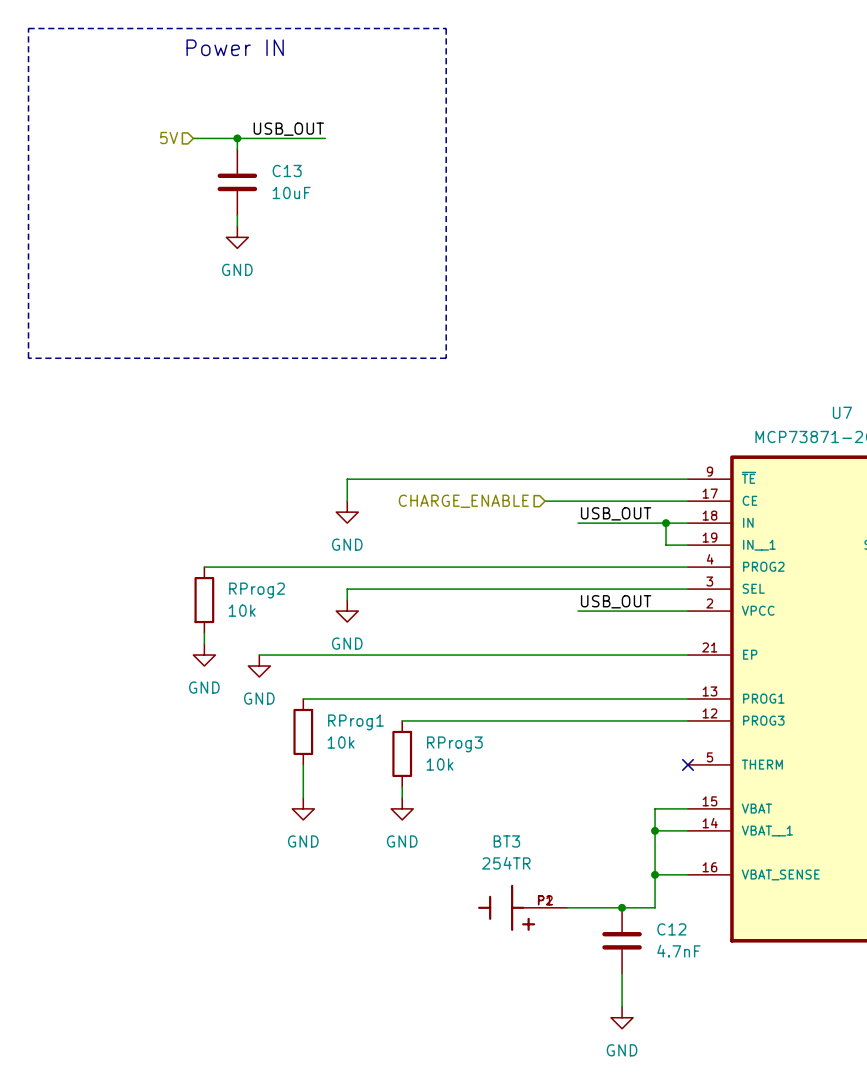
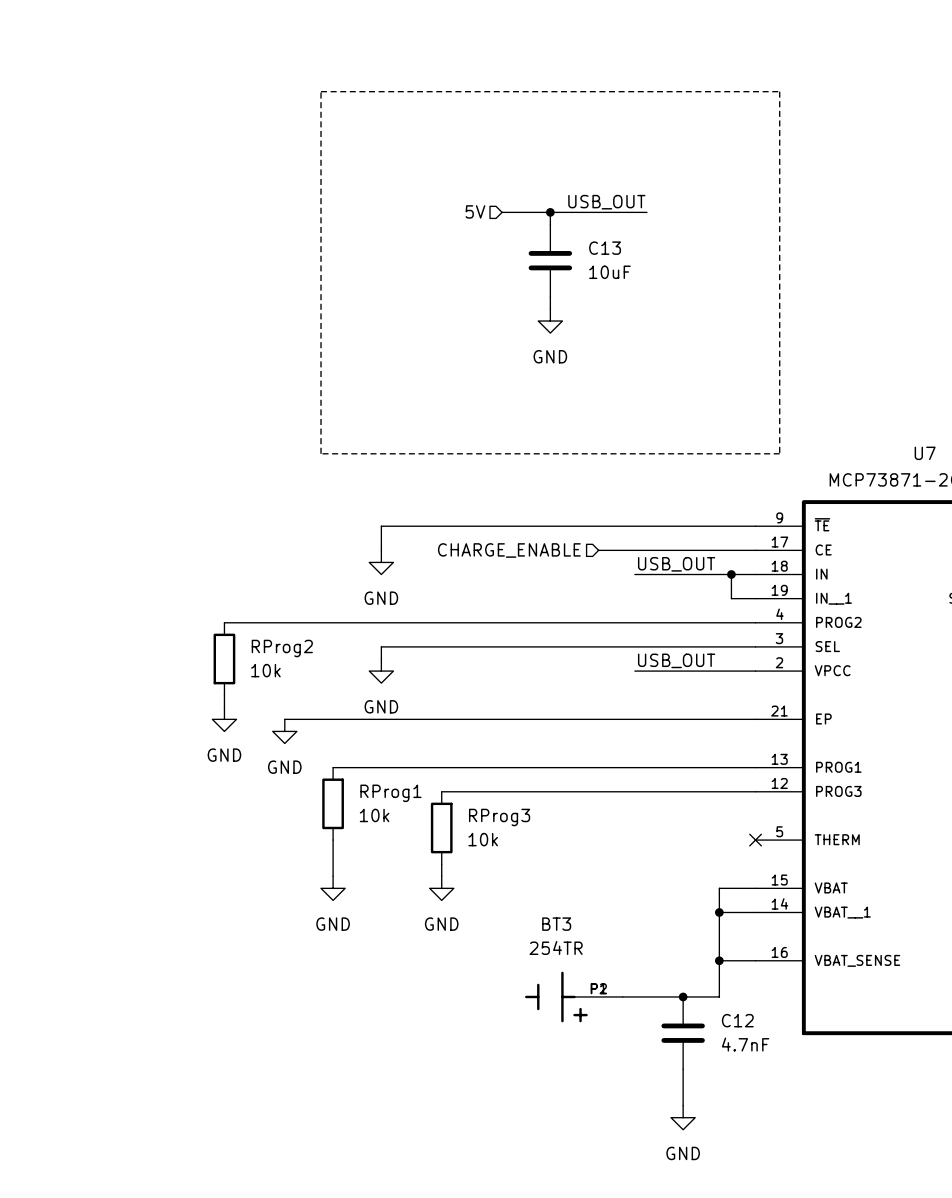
line: (28, 28) (446, 28) (446, 358) (28, 358) (28, 28) -> none
text: Power IN (235, 47) -> none
line: none -> (321, 91) (779, 91) (779, 453) (321, 453) (321, 91)
label: USB_OUT (288, 129) -> none
hierarchical label: 5V (169, 138) -> none
wire: (193, 138) (325, 138) -> none
wire: (237, 138) (237, 149) -> none
junction: (237, 138) -> none
C13 position: (237, 182) -> (550, 260)
label: none -> USB_OUT (606, 202)
hierarchical label: none -> 5V (475, 211)
wire: none -> (502, 212) (646, 212)
wire: none -> (550, 212) (550, 224)
junction: none -> (550, 212)
wire: (237, 215) (237, 226) -> none
power symbol: GND (237, 237) -> none
wire: none -> (550, 296) (550, 308)
power symbol: none -> GND (550, 321)

